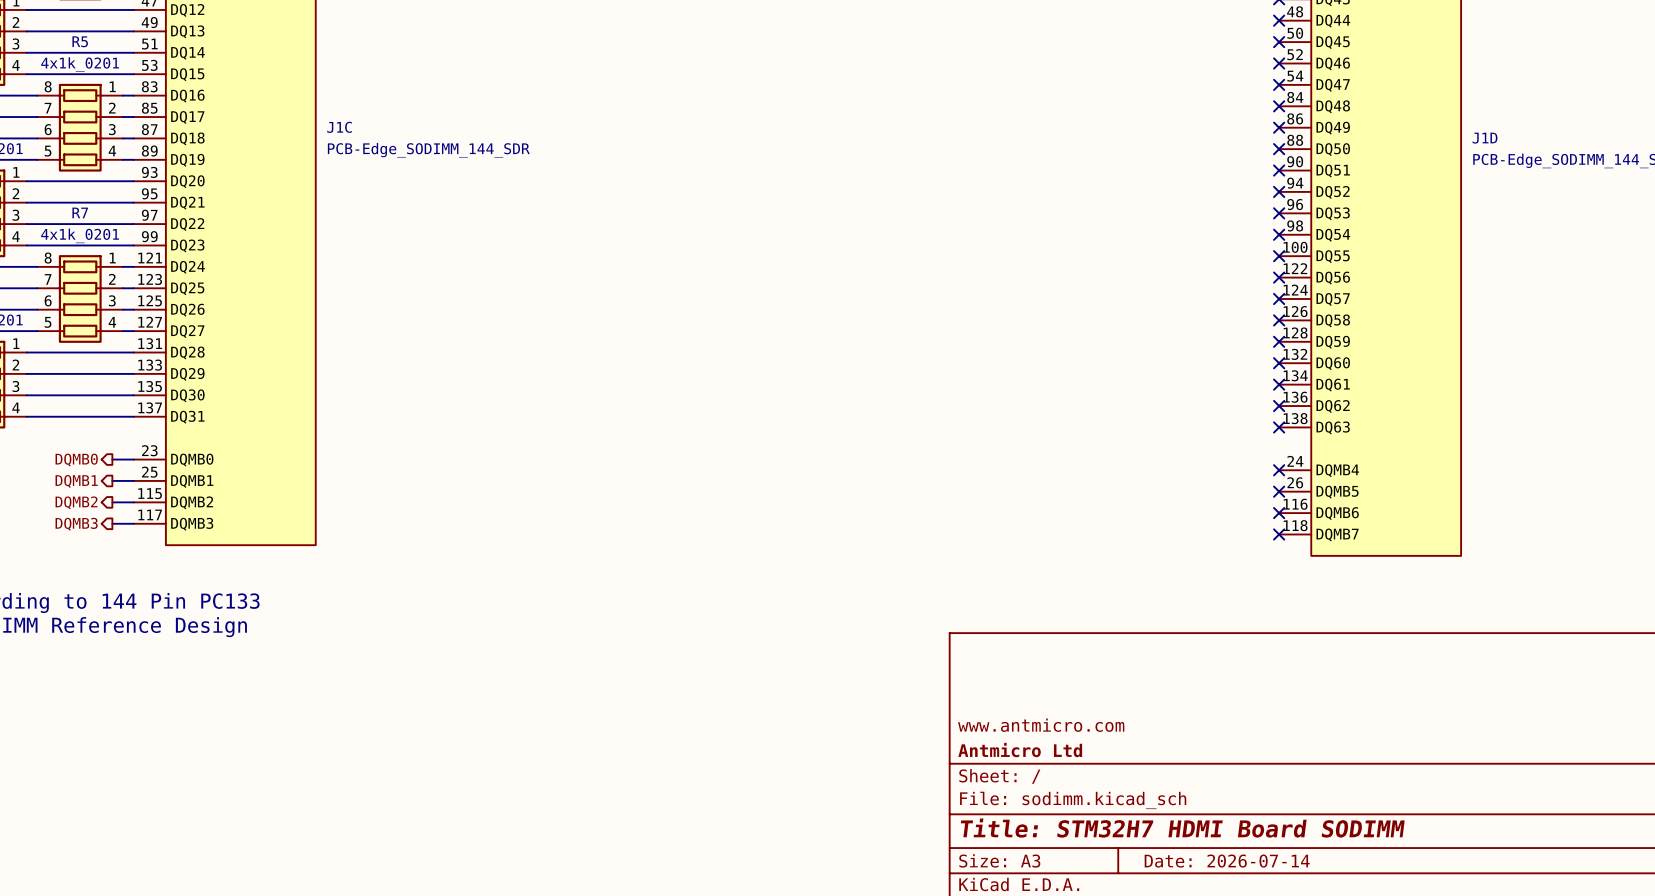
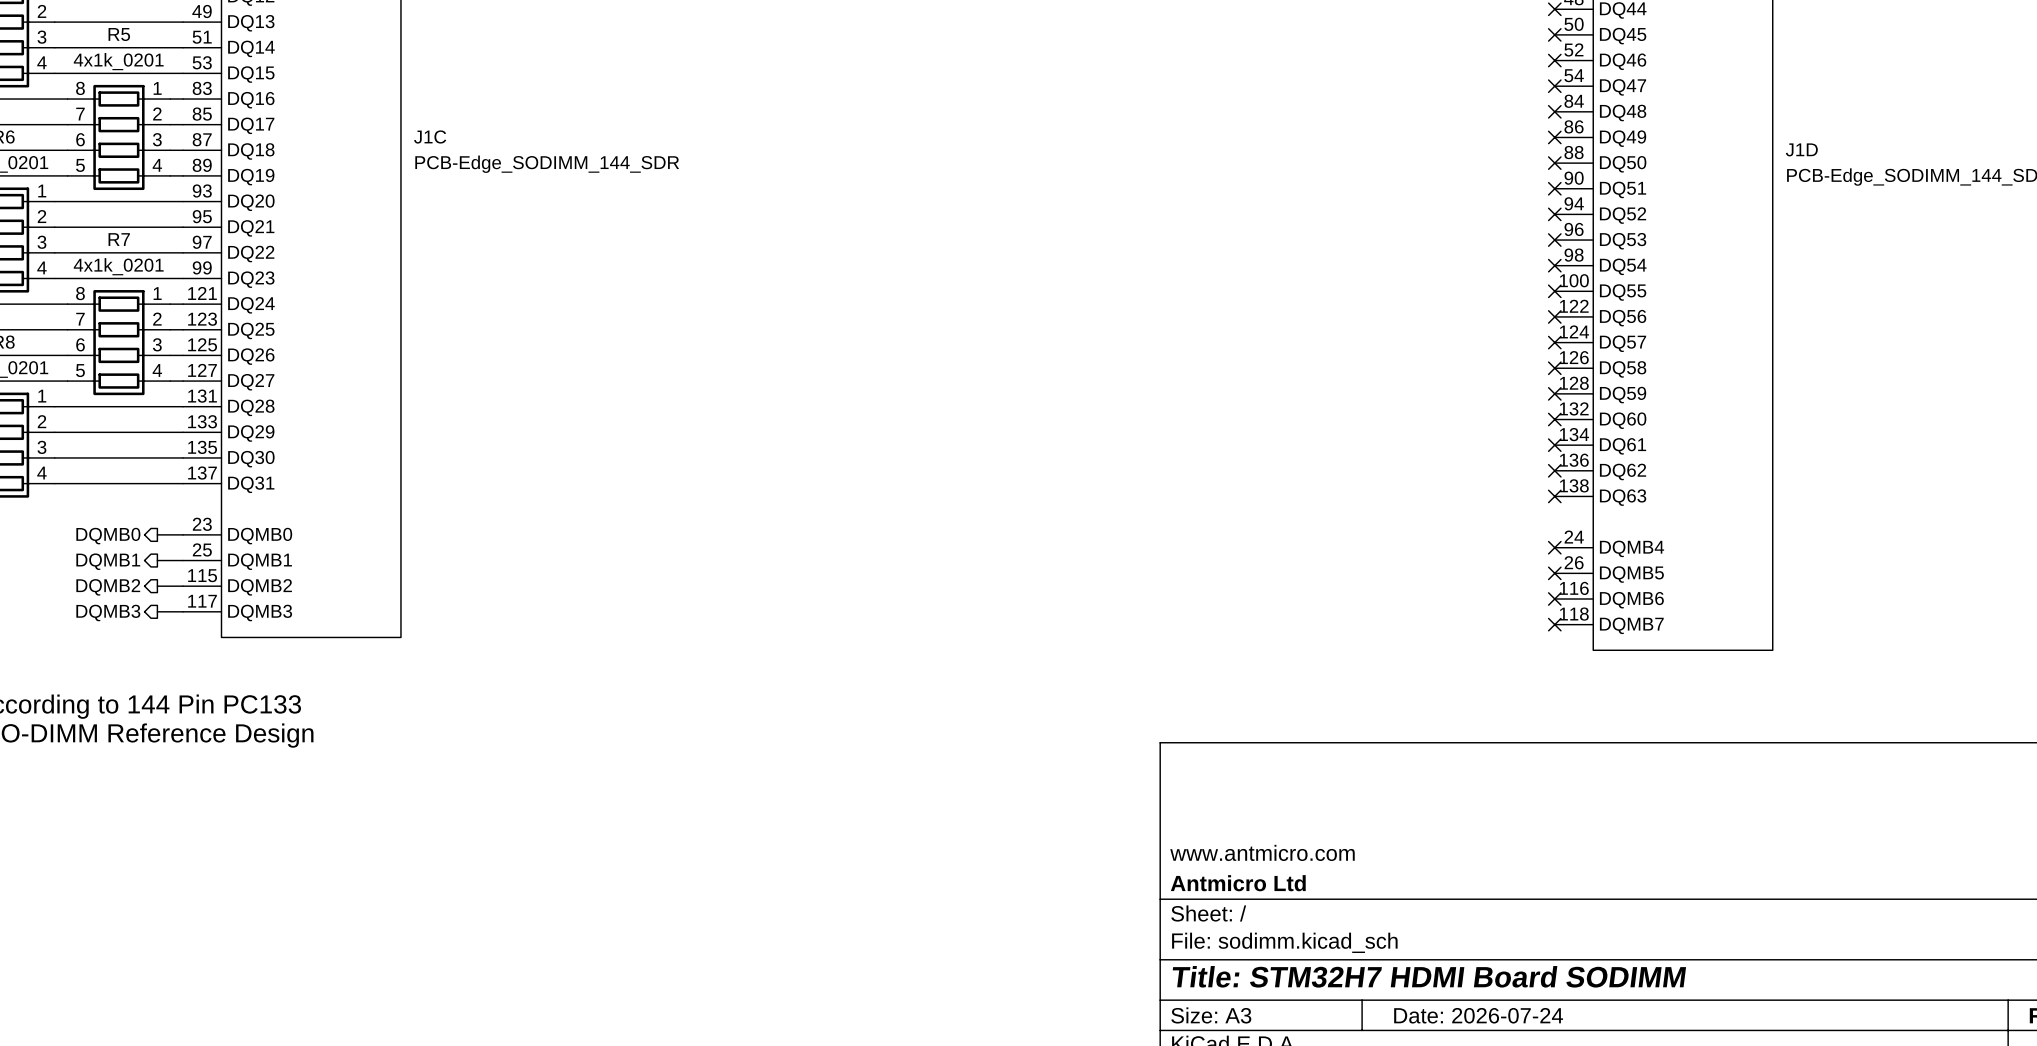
title block: Date: 2026-07-14 (1227, 861) -> Date: 2026-07-24 (1478, 1015)

